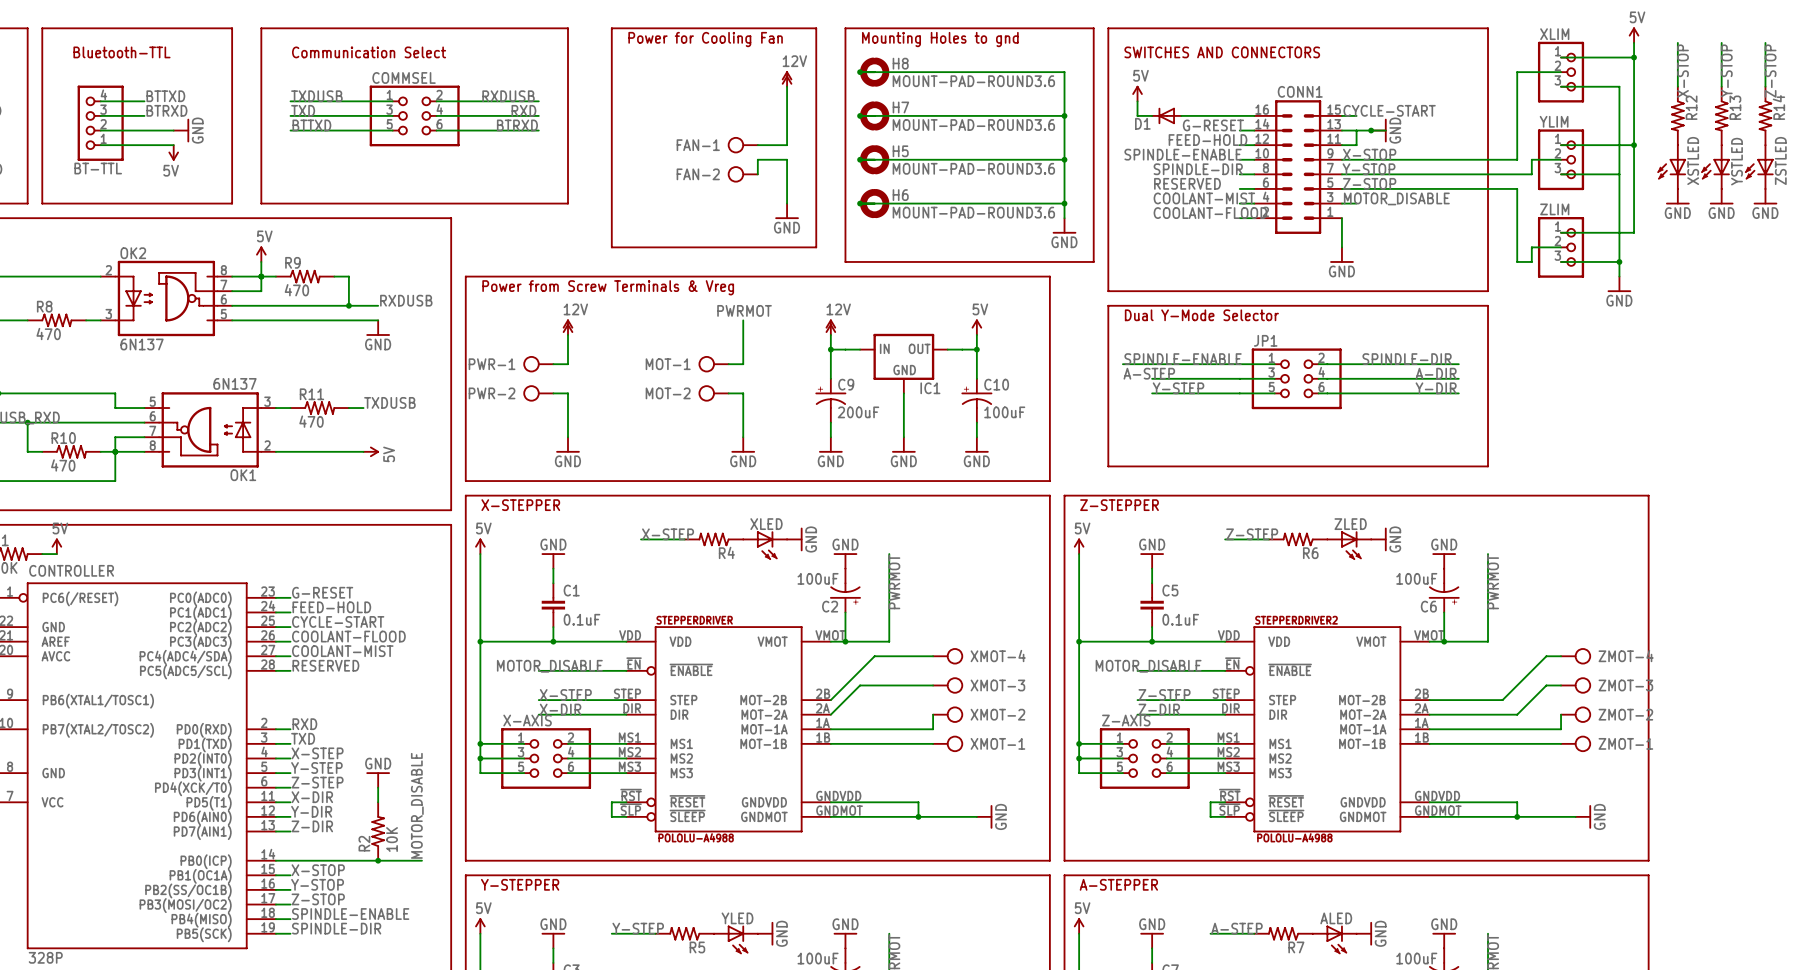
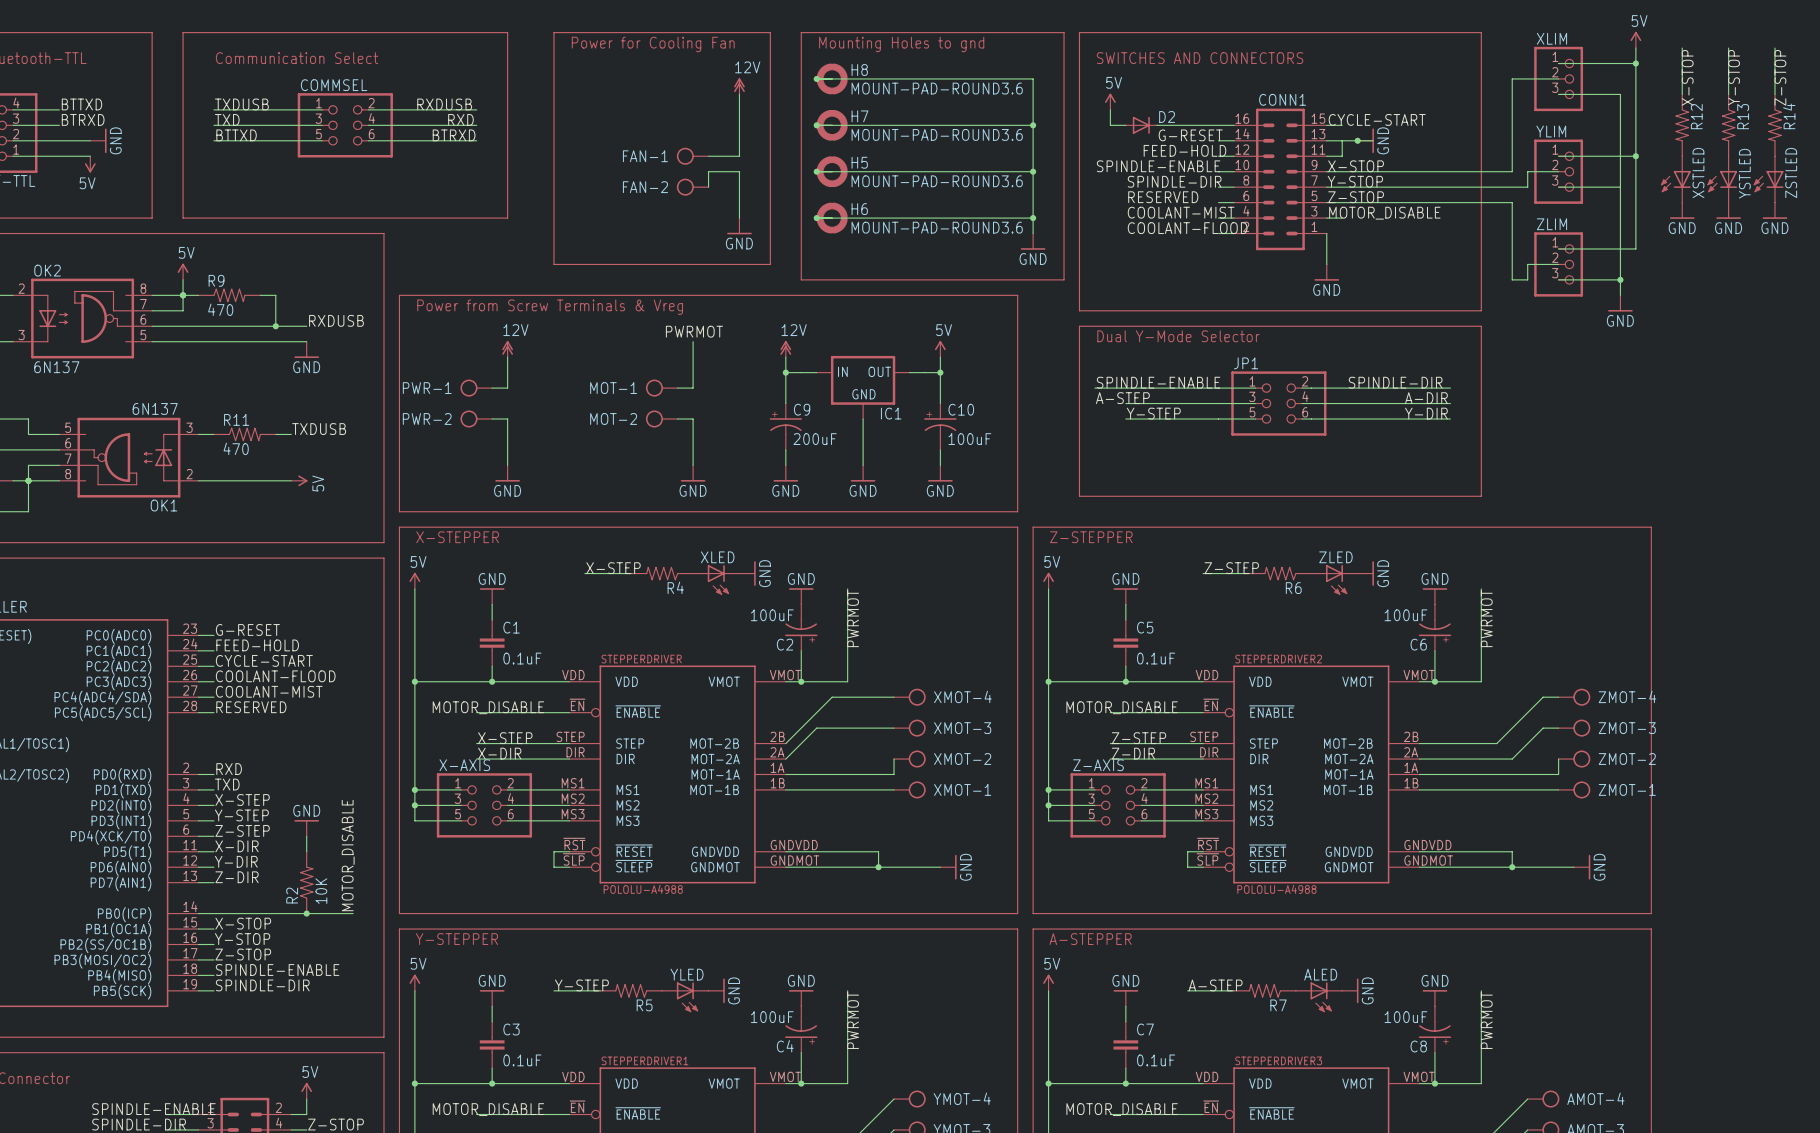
D1: (1166, 115) -> none
D2: none -> (1141, 125)

